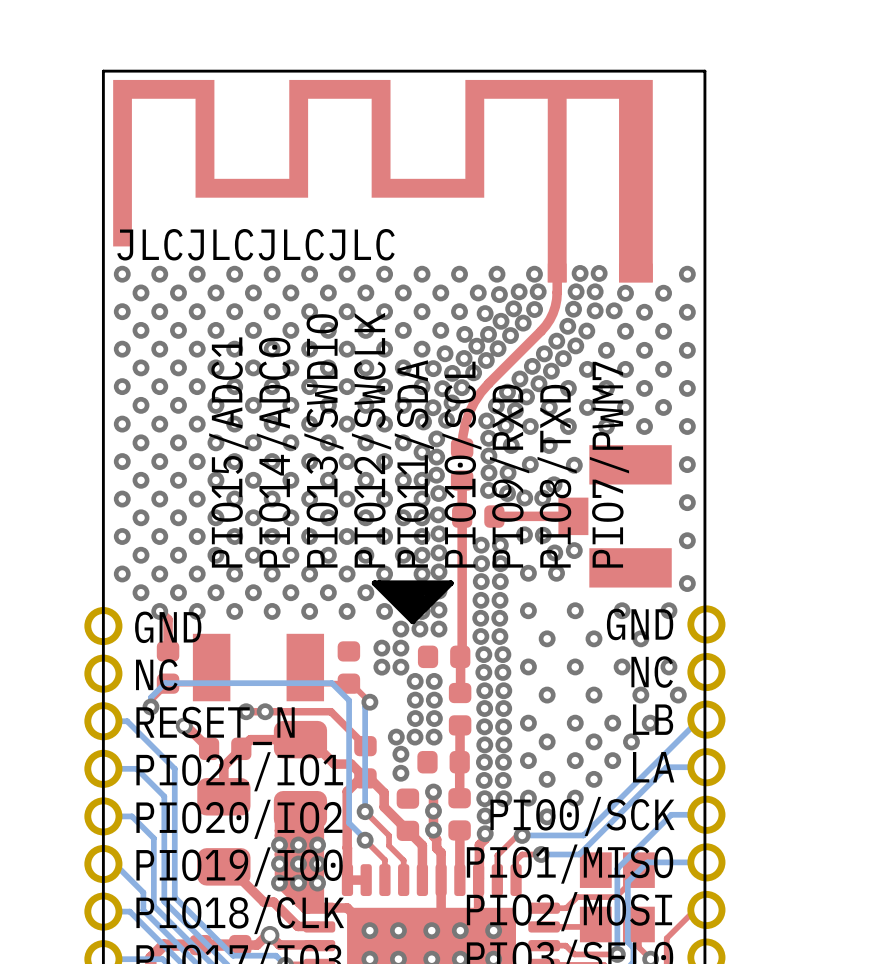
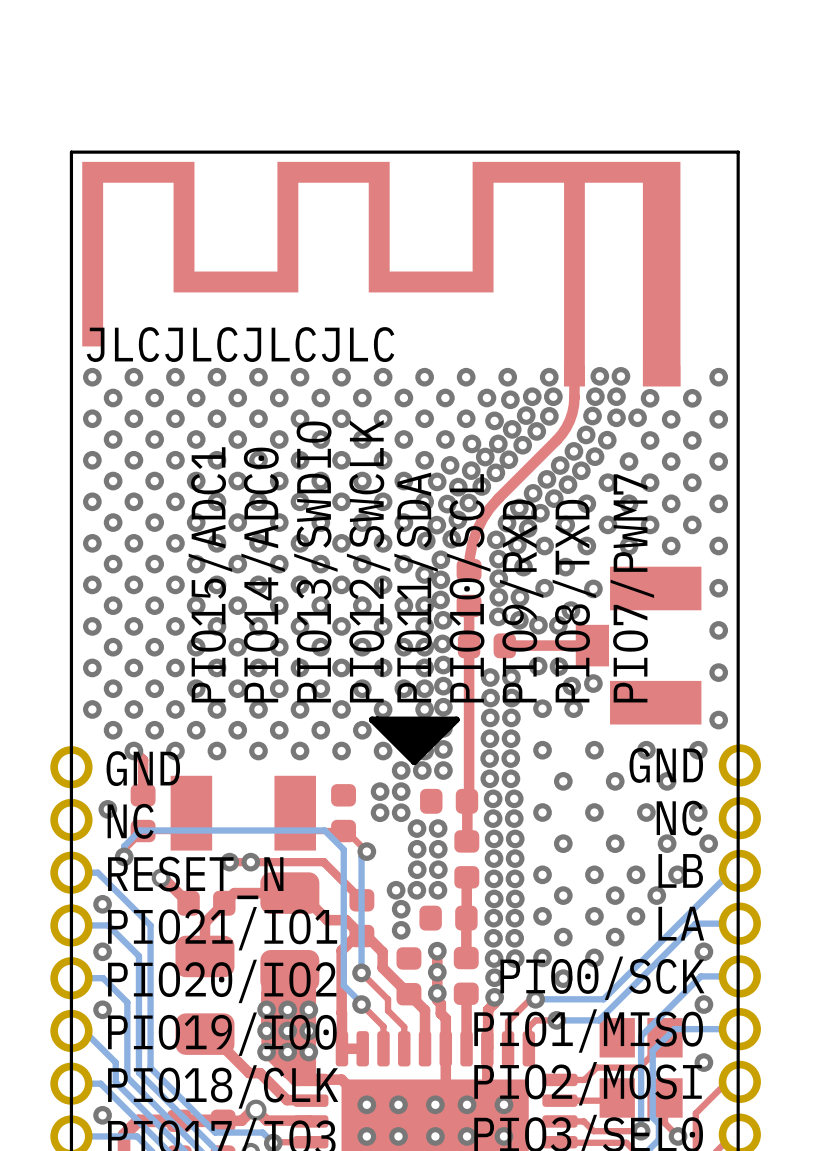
via: none -> (107, 809)
via: none -> (102, 904)
via: none -> (102, 951)
via: none -> (703, 951)
via: none -> (703, 1004)
via: none -> (102, 1009)
via: none -> (703, 1062)
via: none -> (102, 1115)

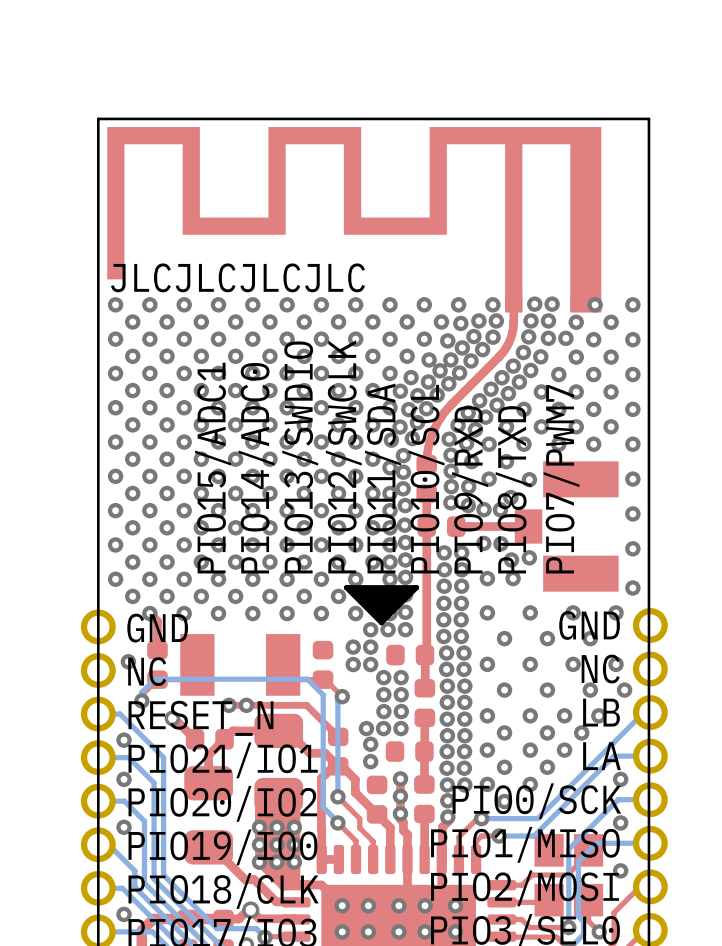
via: none -> (595, 304)

